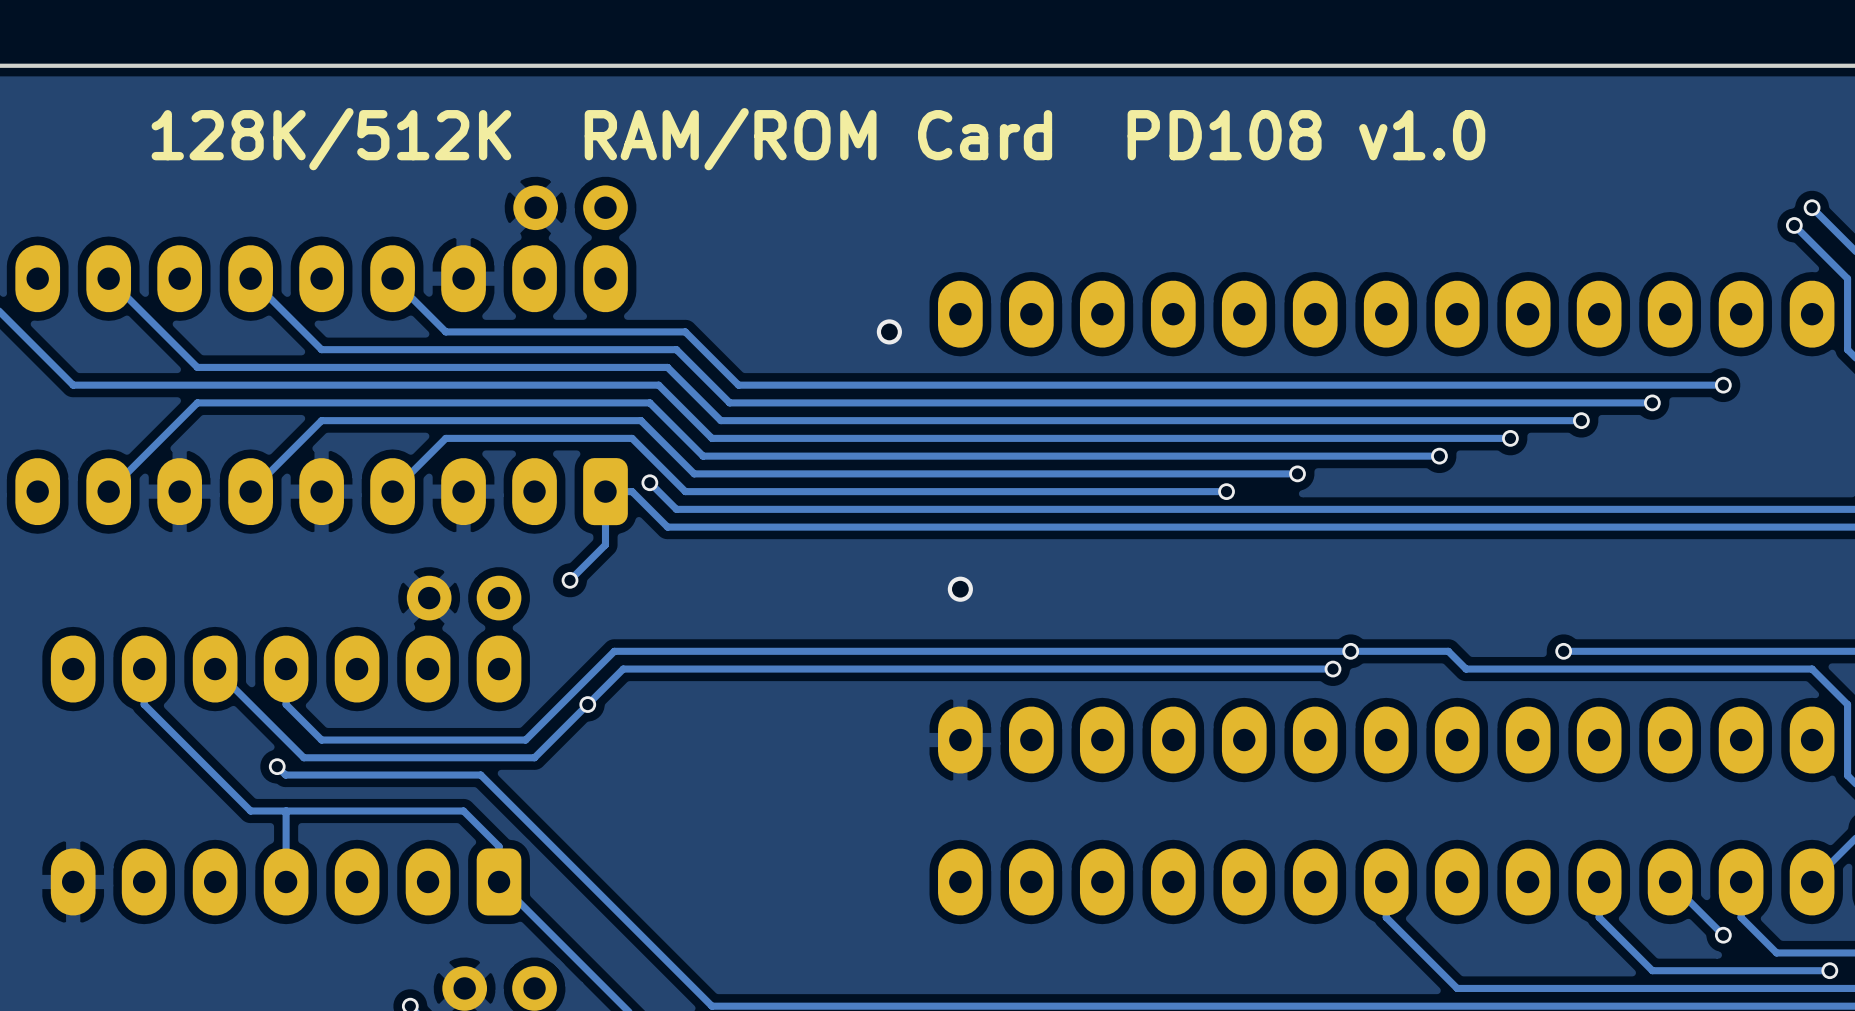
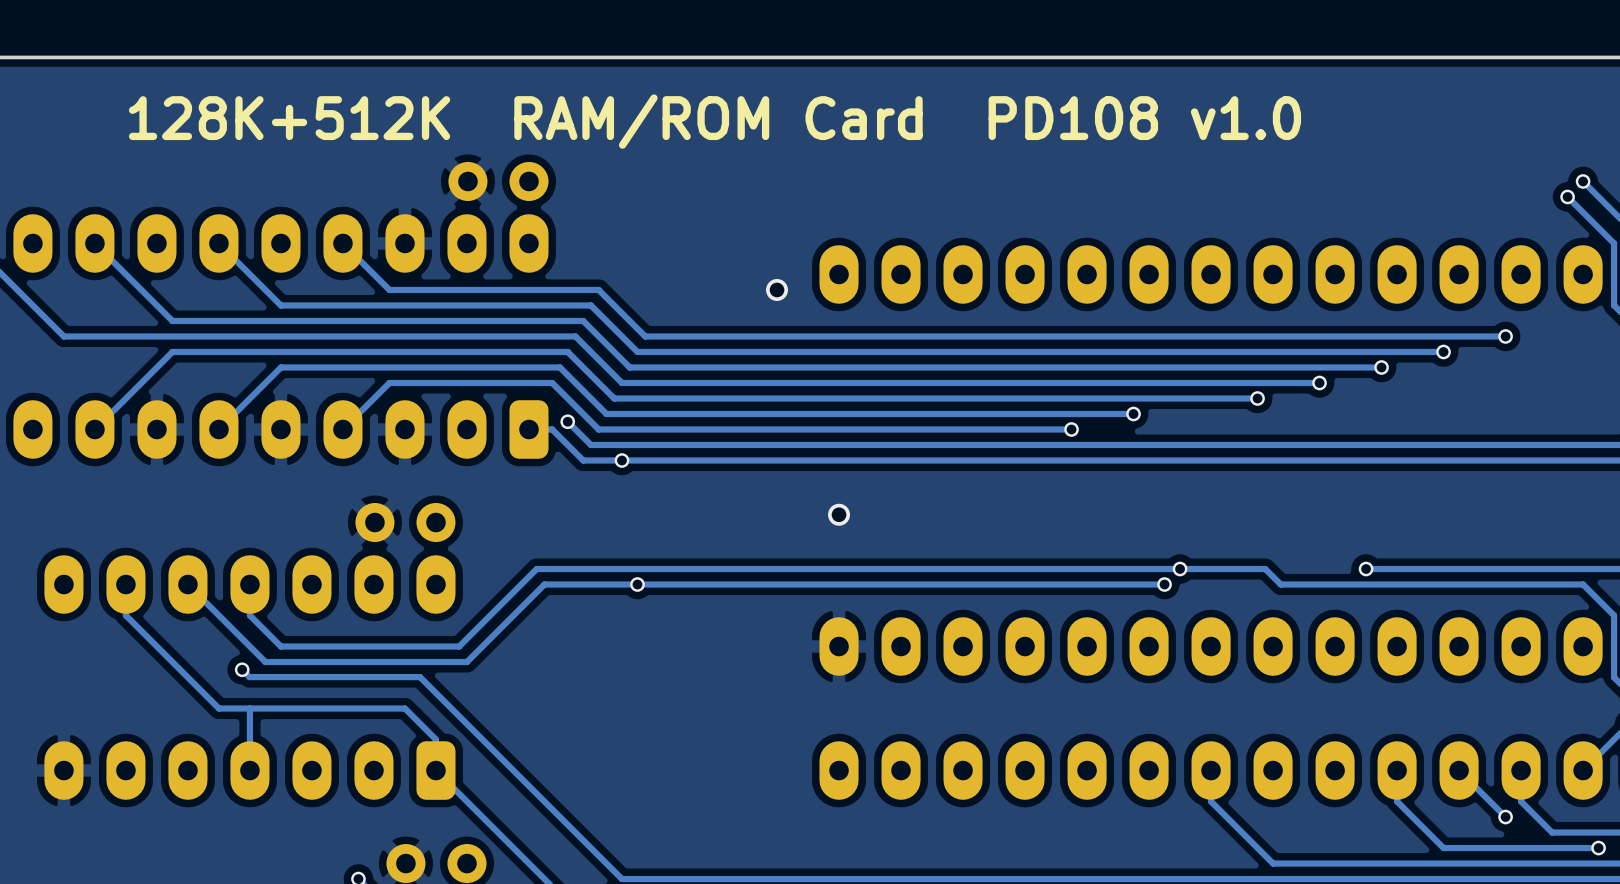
text: 128K/512K RAM/ROM Card PD108 v1.0 (818, 139) -> 128K+512K RAM/ROM Card PD108 v1.0 (715, 121)
track: (605, 491) (605, 544) (570, 580) -> none
via: none -> (622, 460)
via: (570, 580) -> none
via: none -> (637, 584)
via: (587, 704) -> none

